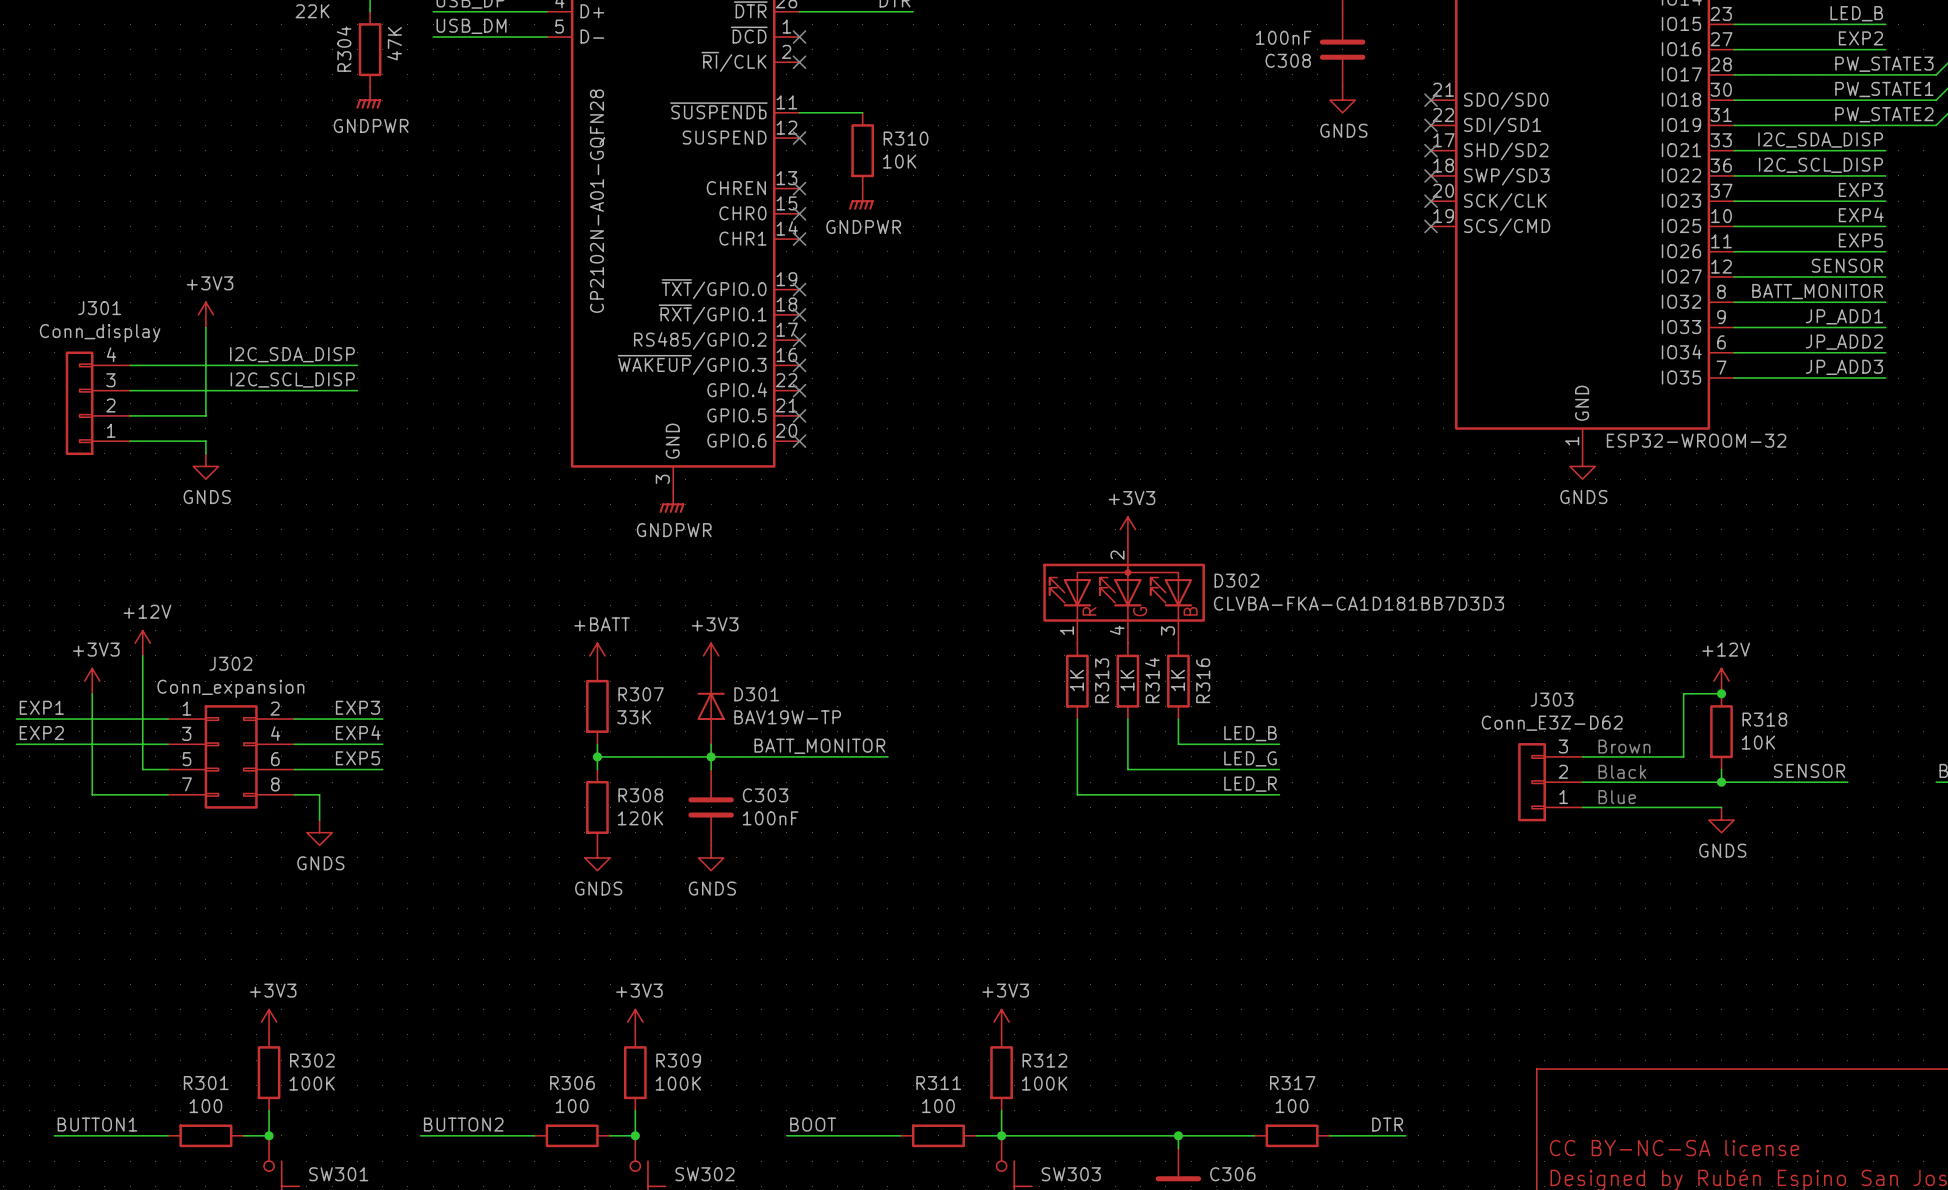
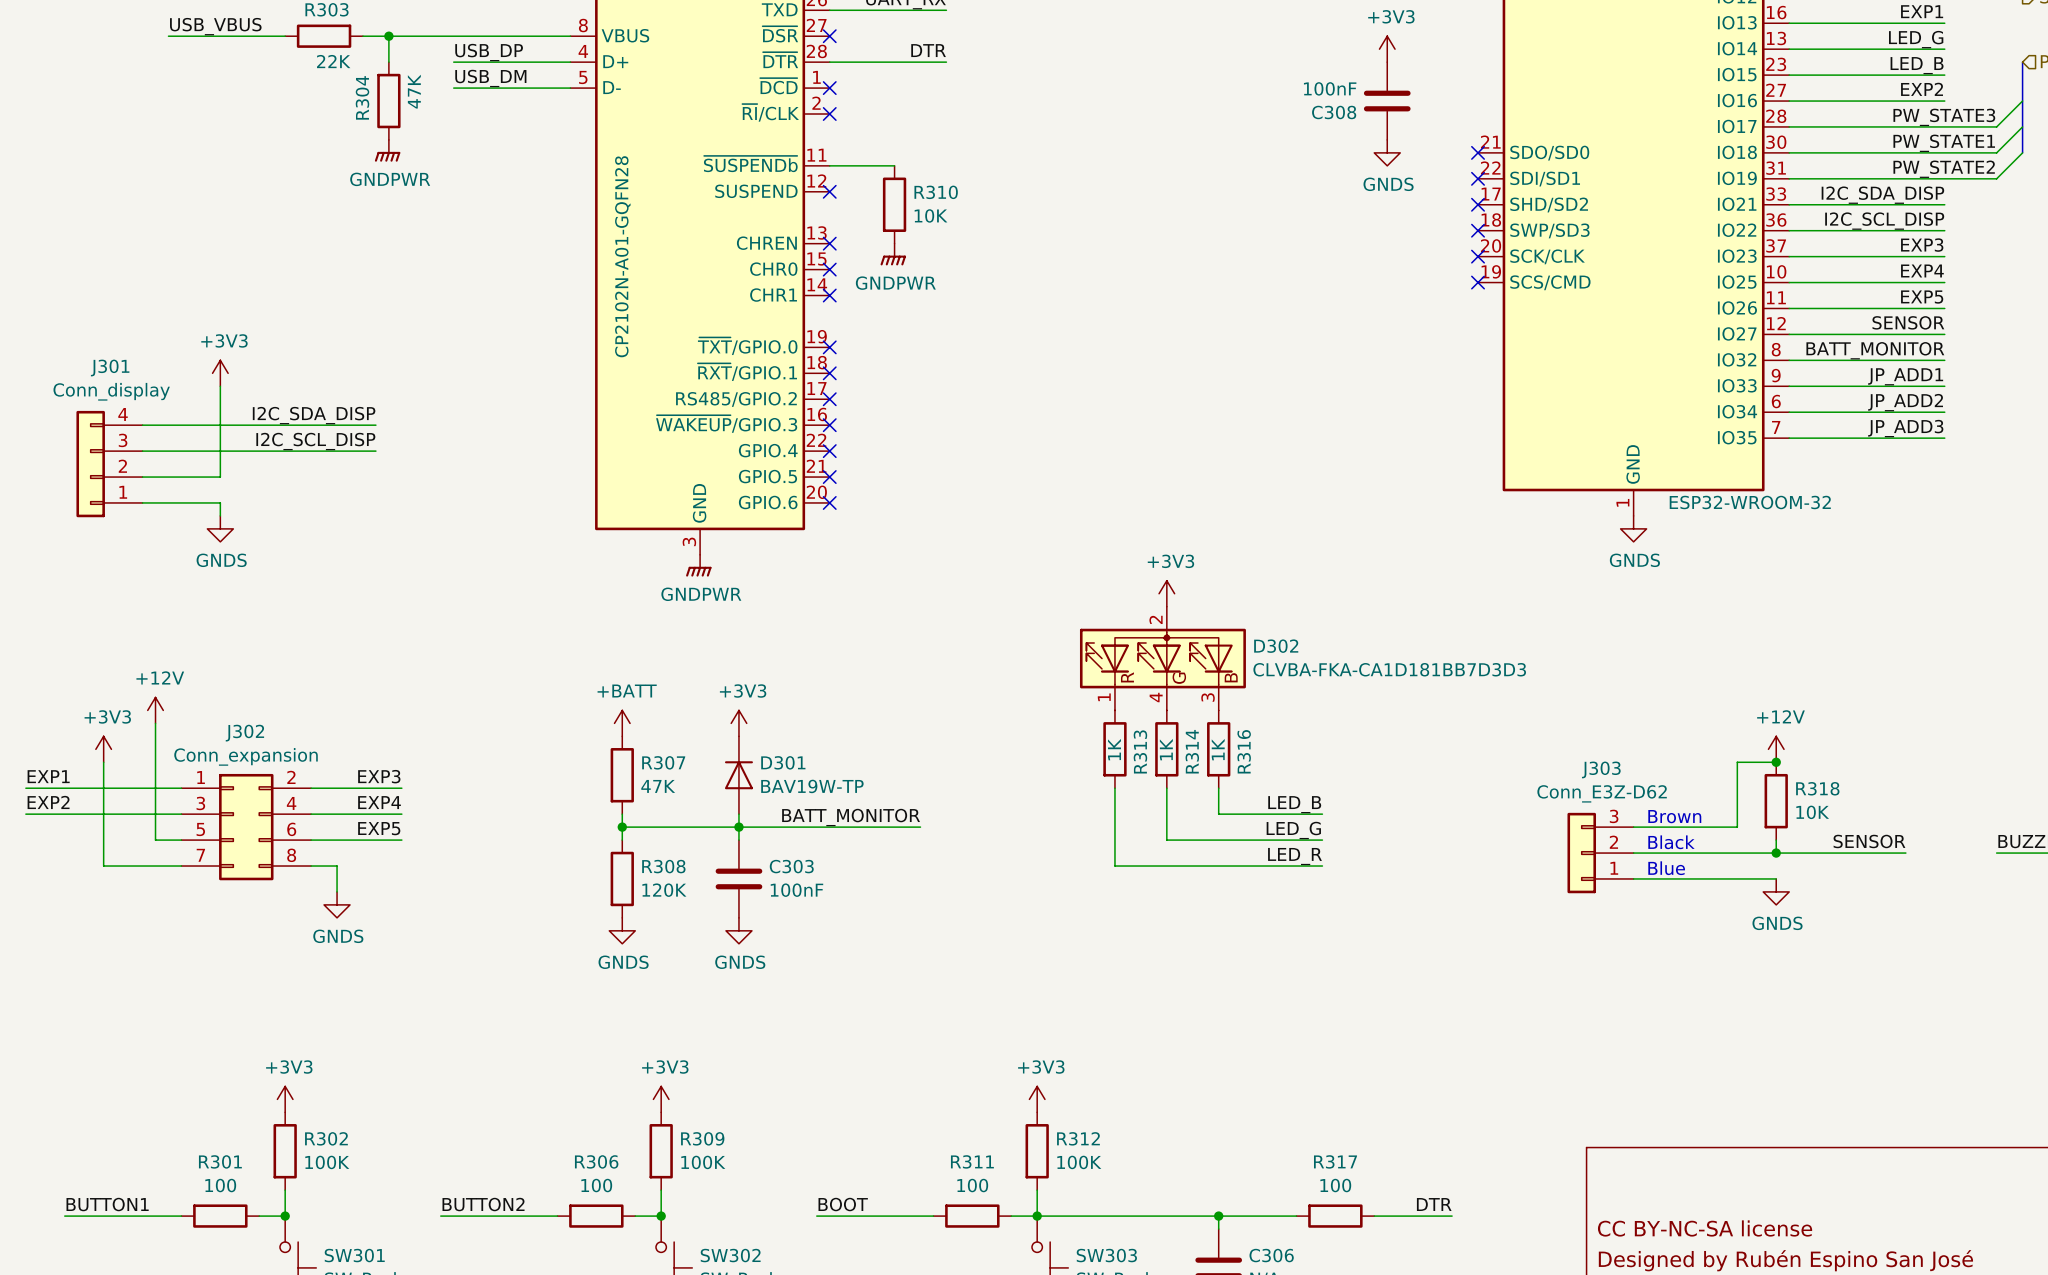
R307 value: 33K (634, 717) -> 47K (658, 786)

